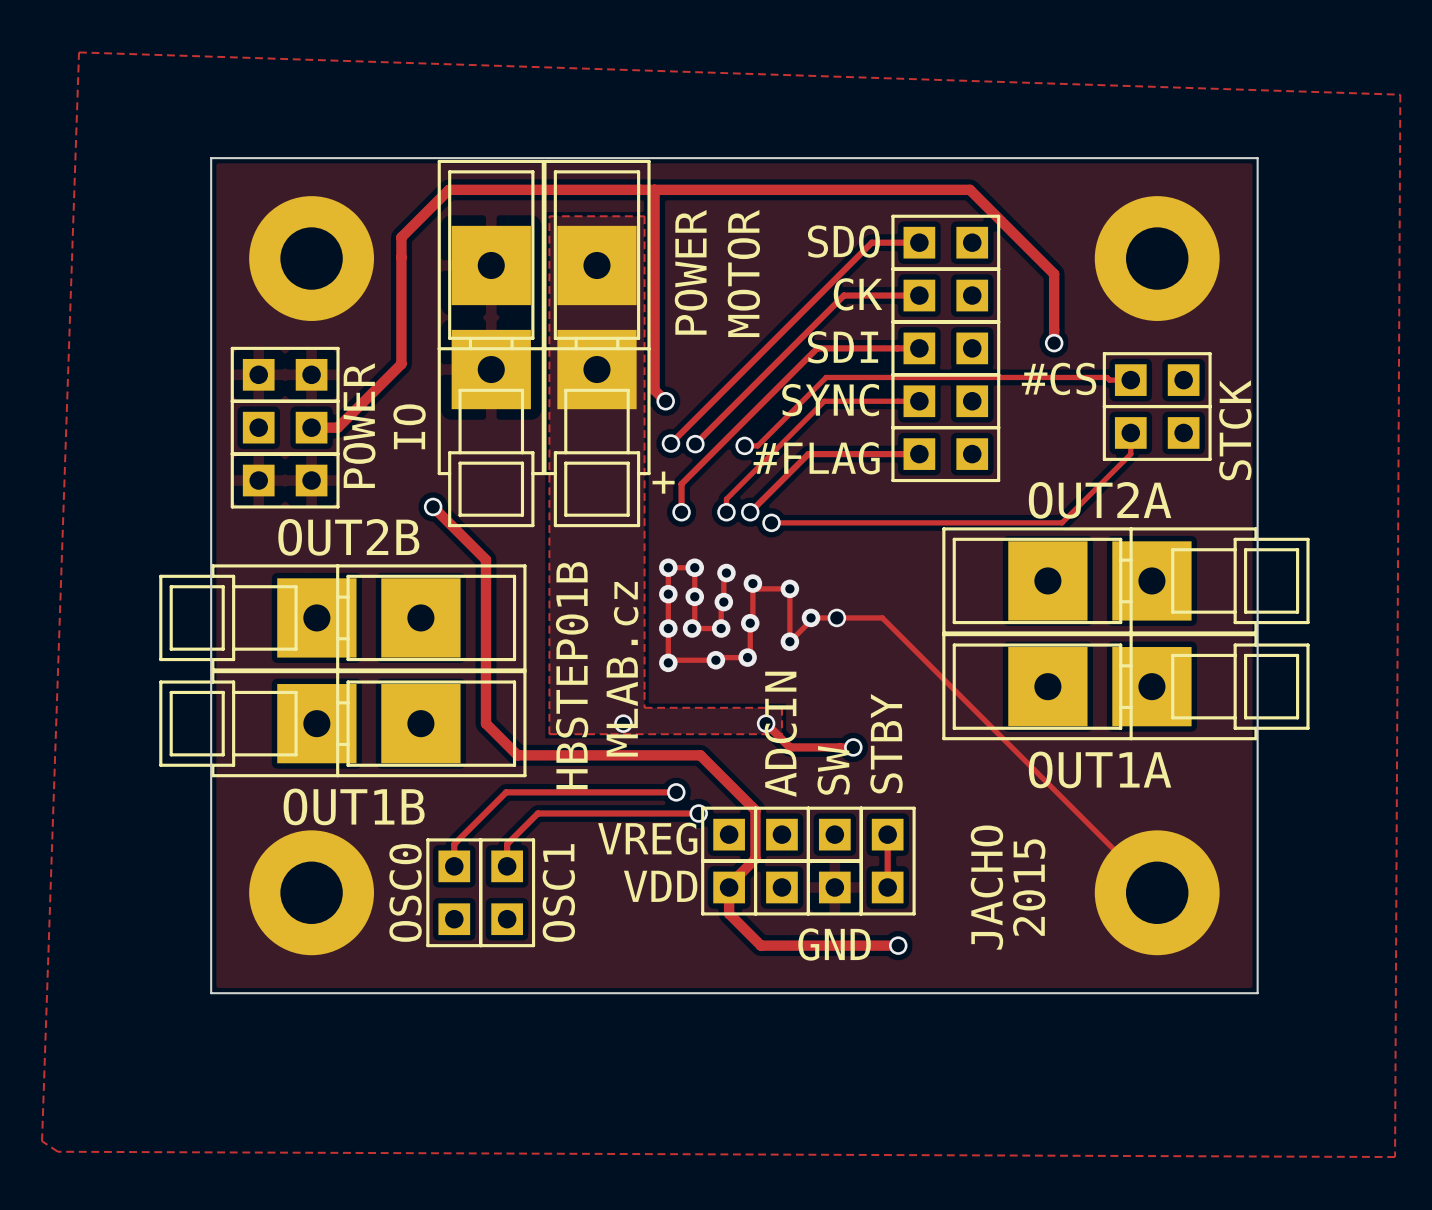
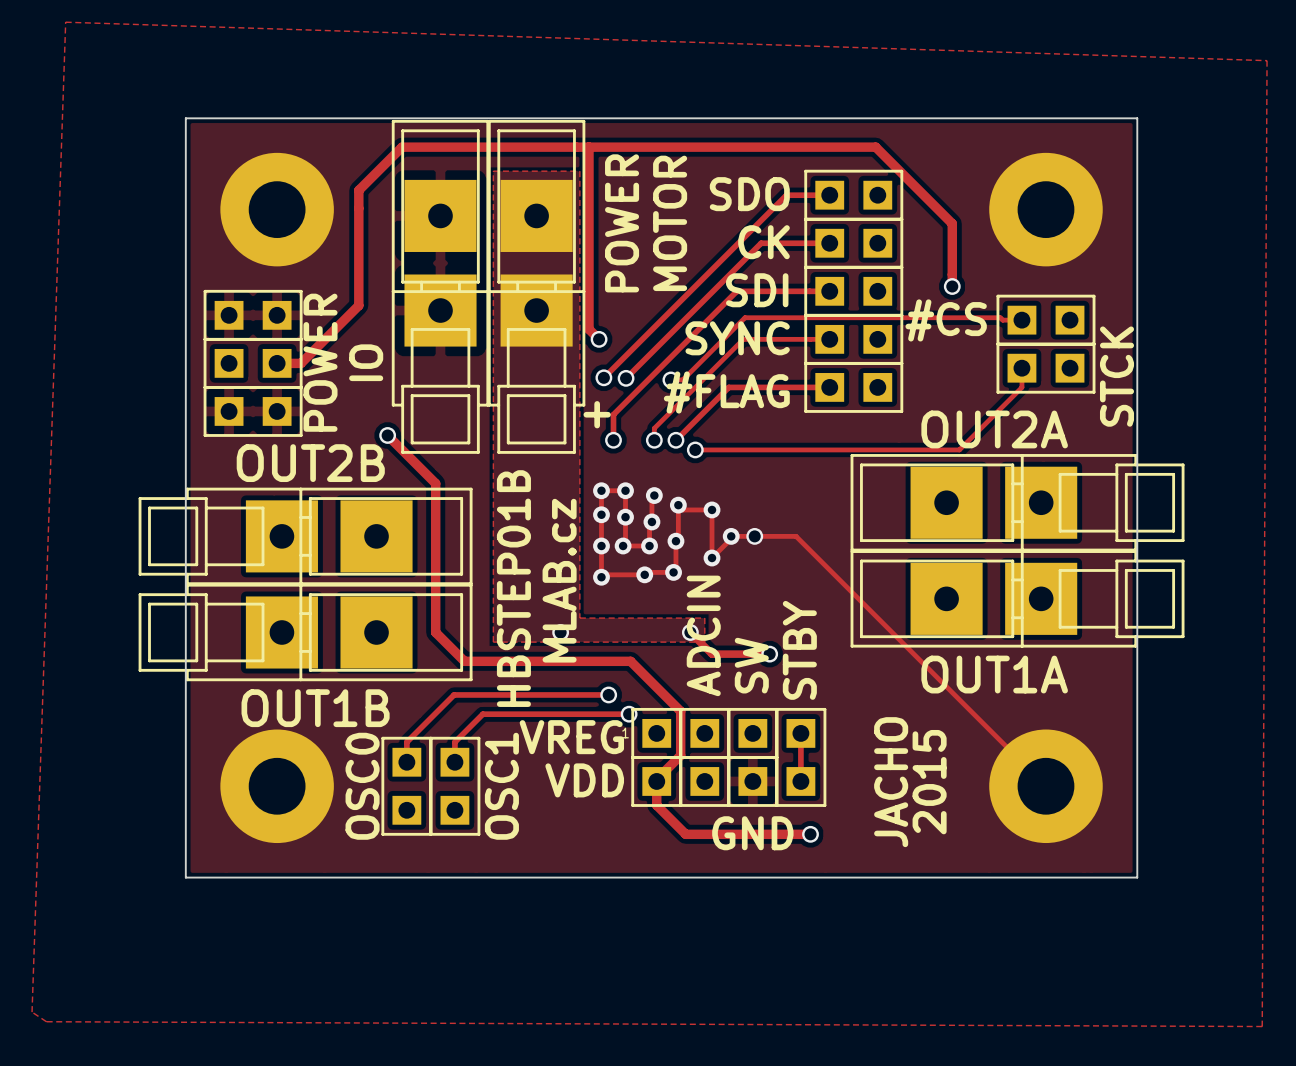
part text: none -> 1 (625, 733)

